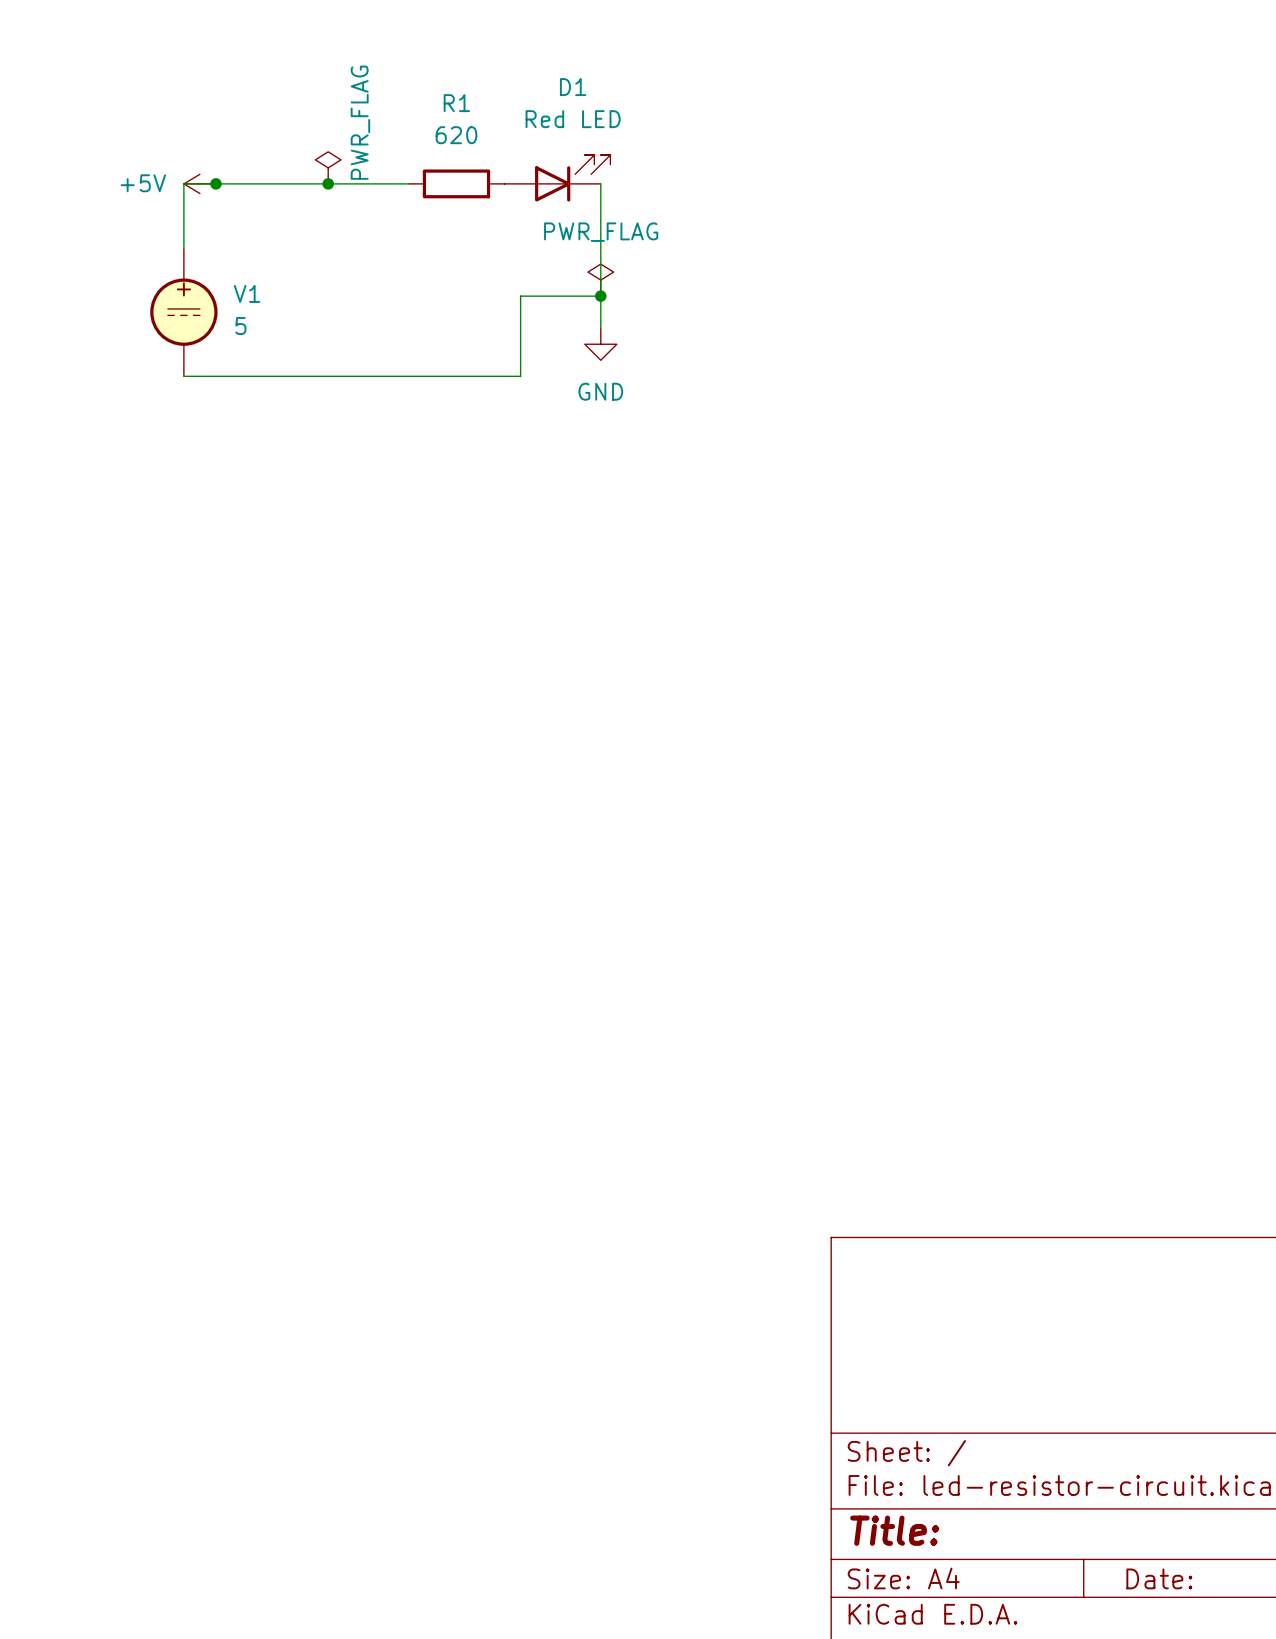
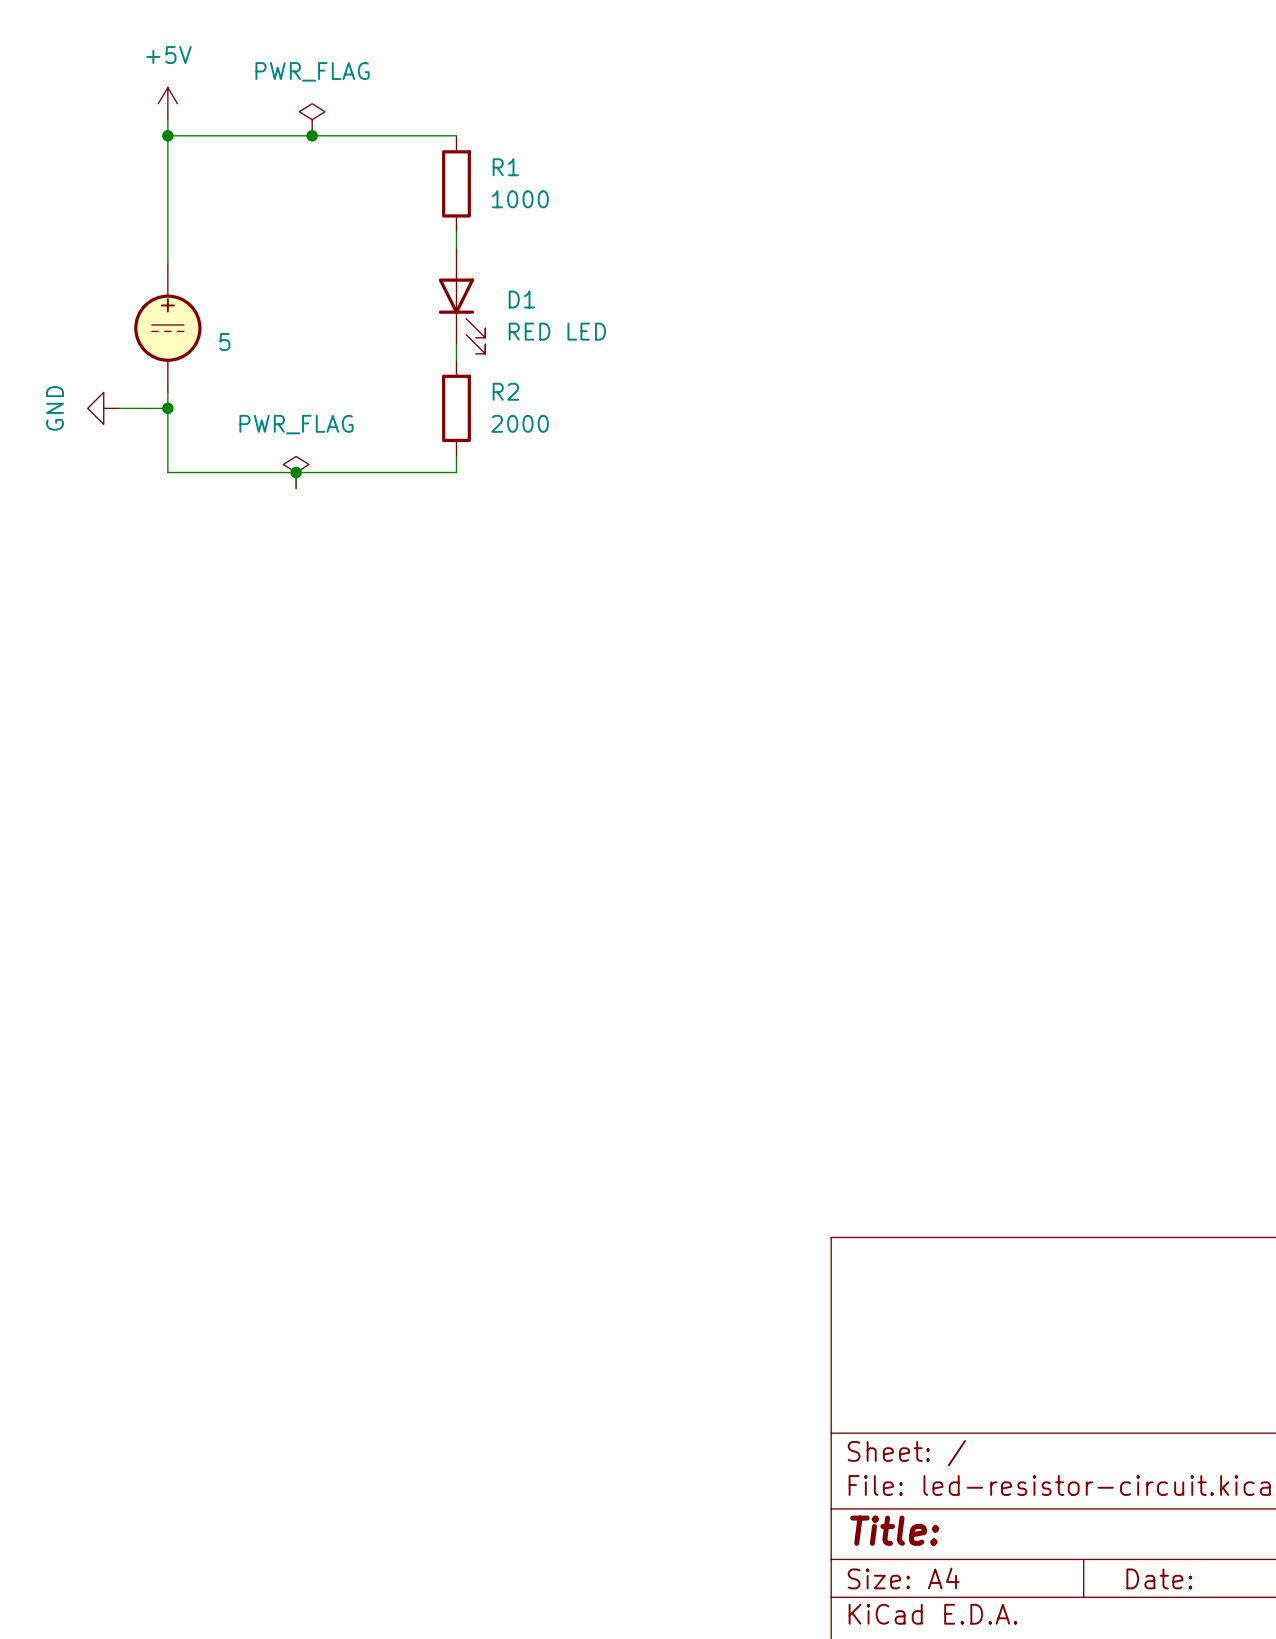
D1 name position: D1 (573, 87) -> D1 (521, 299)
R1 name position: R1 (456, 103) -> R1 (505, 167)
wire: none -> (167, 119) (167, 264)
D1 value: Red LED (573, 119) -> RED LED (557, 331)
power symbol text rotation: 0° (360, 122) -> 90° clockwise (312, 71)
wire: none -> (167, 135) (456, 135)
junction: none -> (167, 135)
R1 value: 620 (456, 135) -> 1000 (520, 199)
power symbol position: PWR_FLAG (328, 167) -> PWR_FLAG (312, 119)
D1 position: (557, 178) -> (462, 300)
D1 rotation: 0° (572, 178) -> 90° clockwise (462, 316)
power symbol rotation: 0° (199, 183) -> 90° clockwise (167, 103)
power symbol position: +5V (199, 183) -> +5V (167, 103)
junction: (215, 183) -> none
junction position: (328, 183) -> (312, 135)
wire: (408, 183) (183, 183) (183, 248) -> none
R1 rotation: 0° (456, 183) -> 90° clockwise (456, 183)
wire: (600, 183) (600, 328) -> none
wire: none -> (456, 232) (456, 248)
power symbol: PWR_FLAG (600, 280) -> none
wire: (600, 296) (520, 296) (520, 376) (183, 376) -> none
junction: (600, 296) -> none
V1: 5 (183, 312) -> none
part: none -> 5 (167, 328)
wire: none -> (456, 344) (456, 360)
power symbol: GND (600, 344) -> none
wire: none -> (167, 392) (167, 472) (456, 472) (456, 456)
power symbol: none -> GND (103, 408)
wire: none -> (119, 408) (167, 408)
junction: none -> (167, 408)
R2: none -> 2000 (456, 408)
wire: none -> (296, 472) (296, 488)
junction: none -> (296, 472)
power symbol: none -> PWR_FLAG (296, 472)

